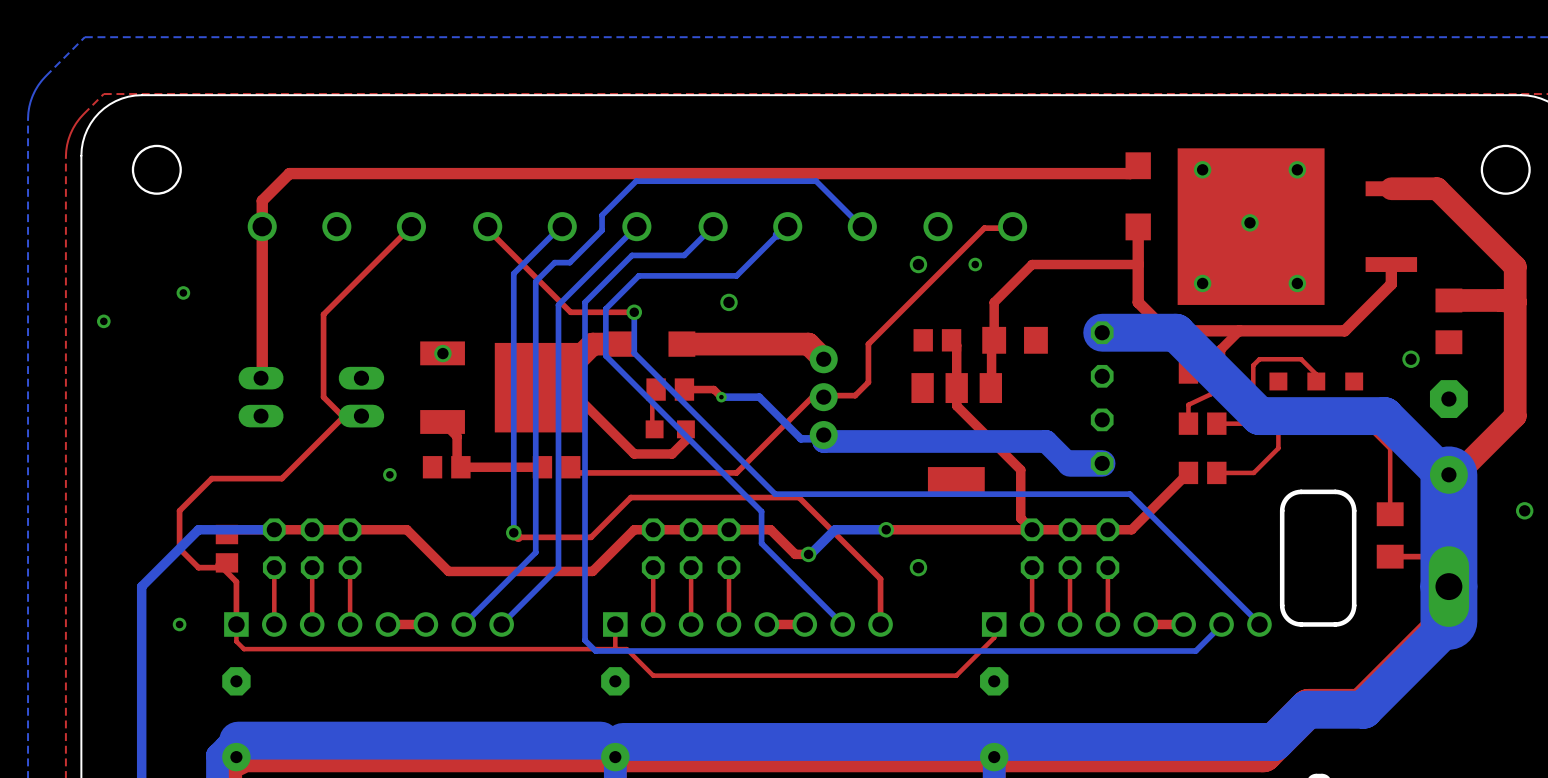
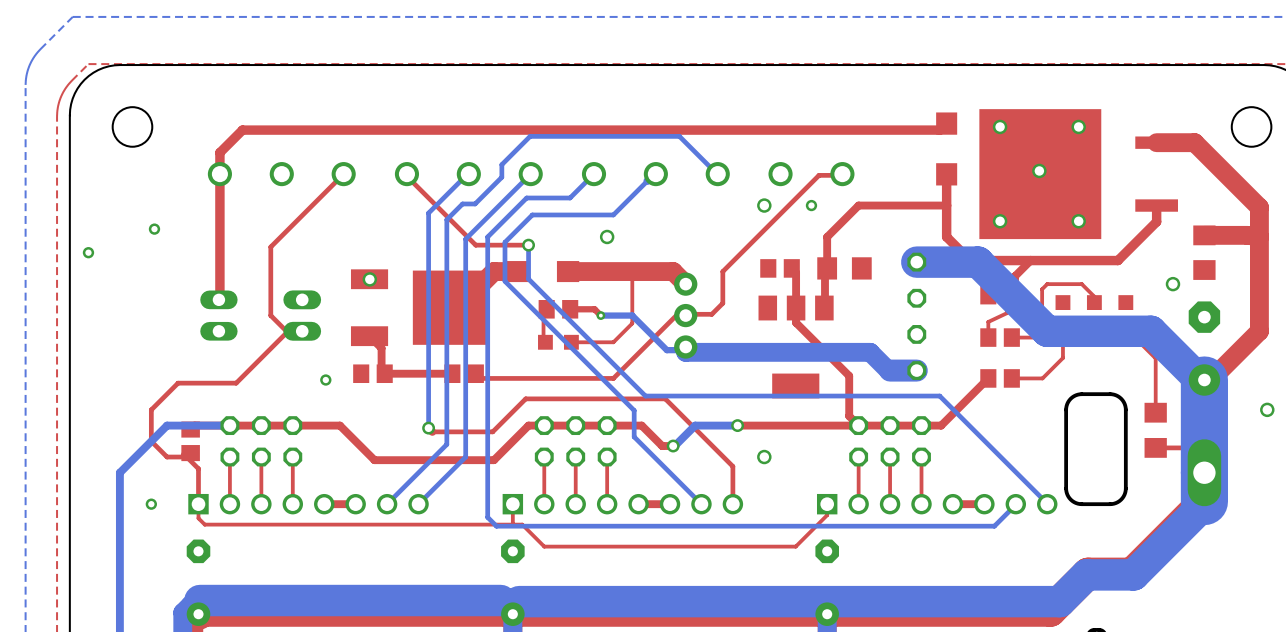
top track: (558, 399) (579, 399) (634, 453) (672, 453) (685, 440) (685, 429) -> (632, 268) (632, 323) (613, 342) (571, 342)

